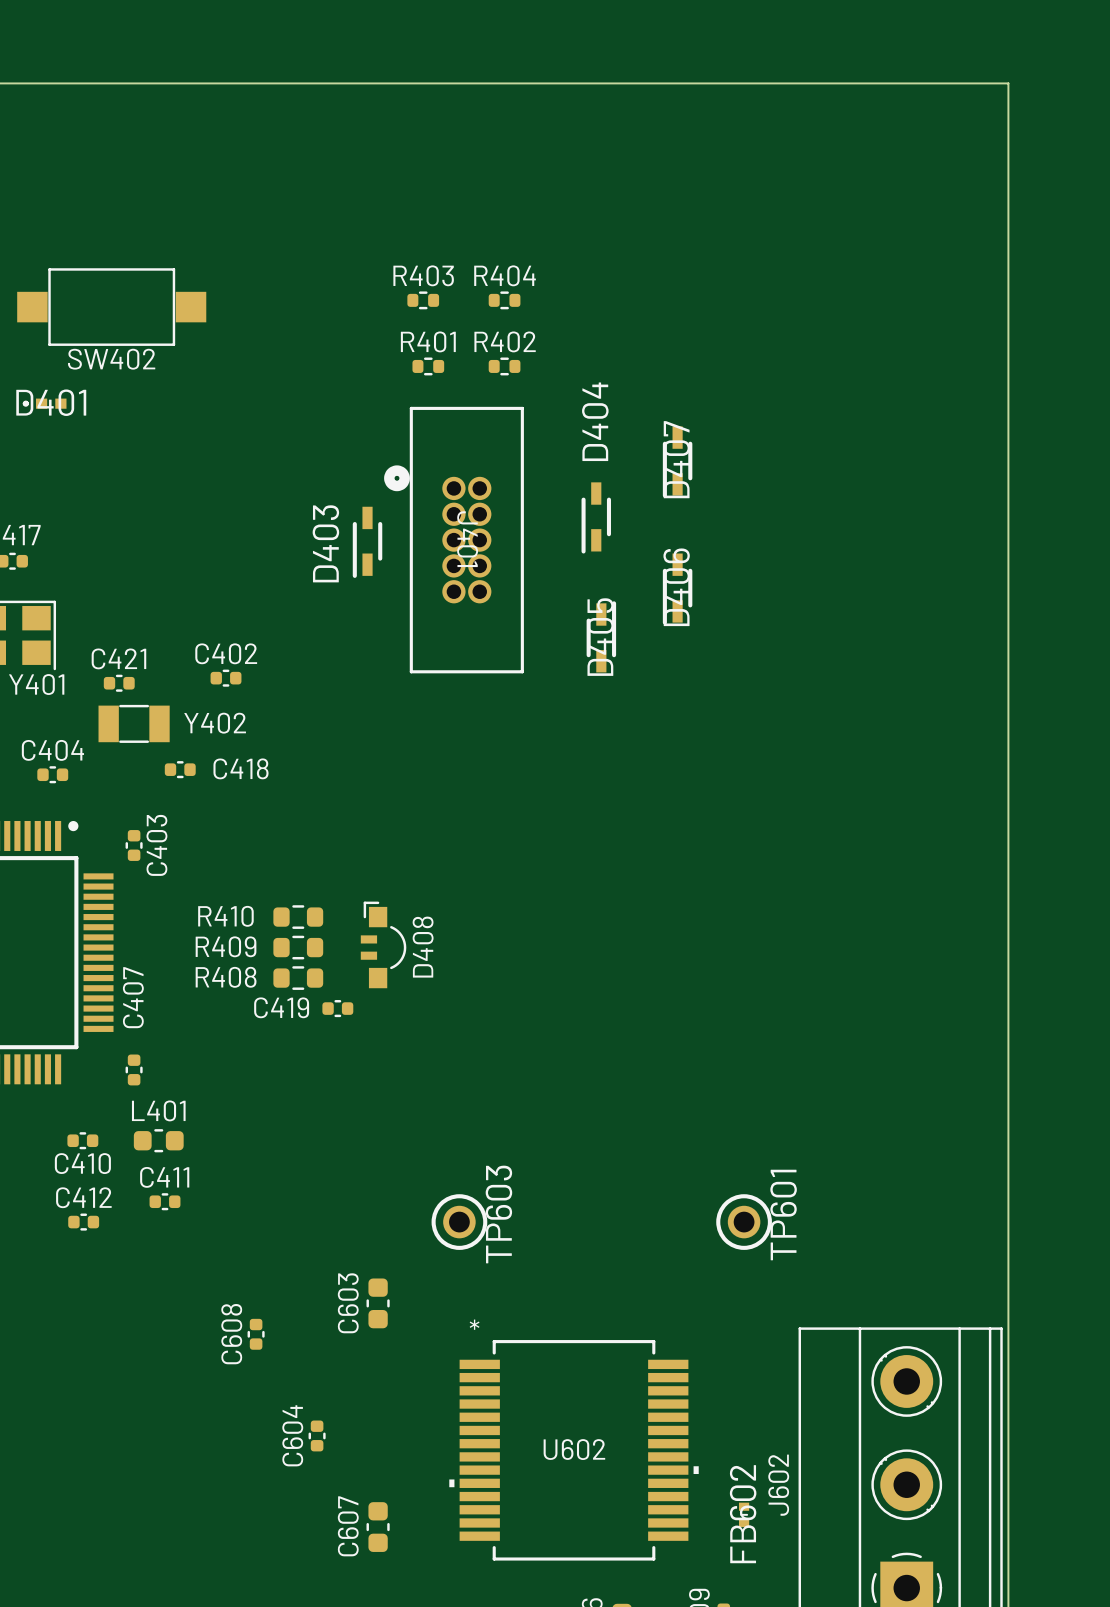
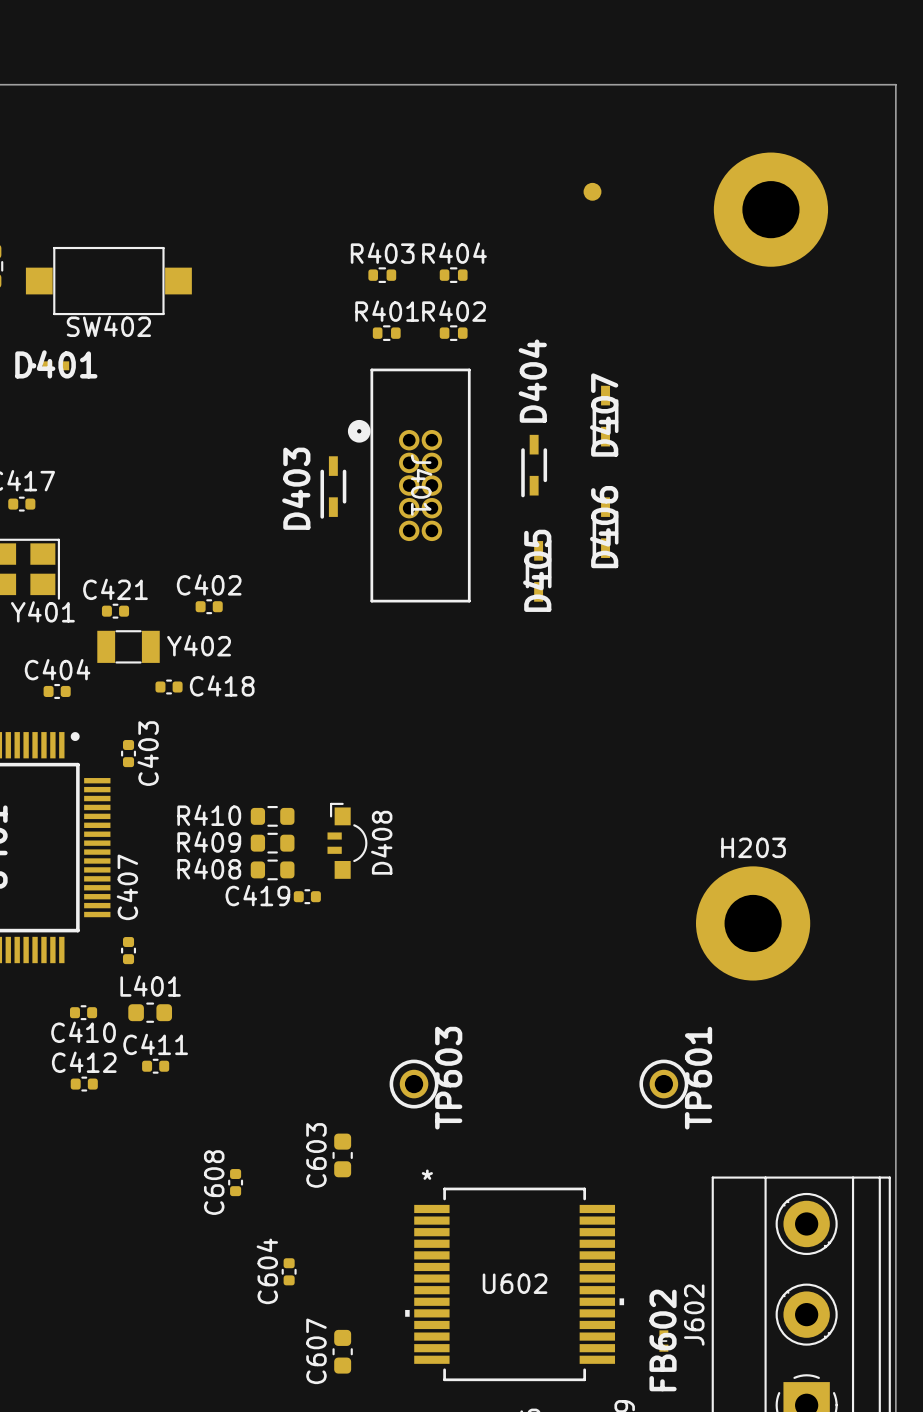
part: none -> (592, 191)
part: none -> (770, 209)
H203: none -> (753, 923)

